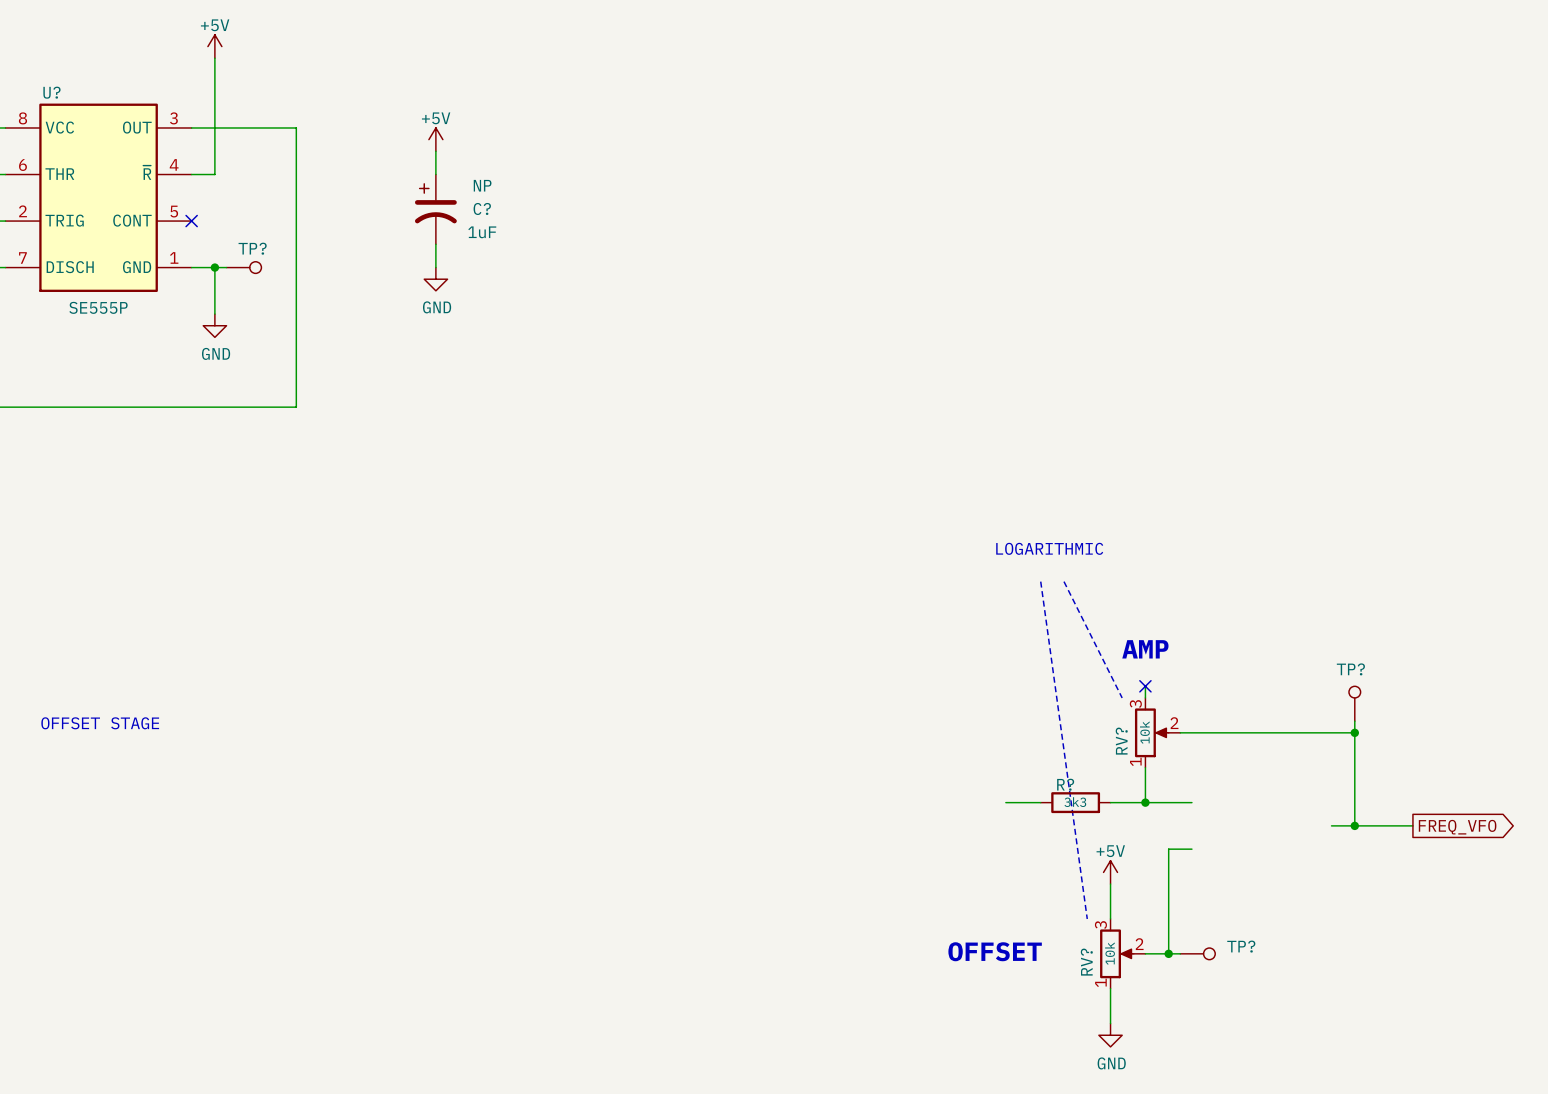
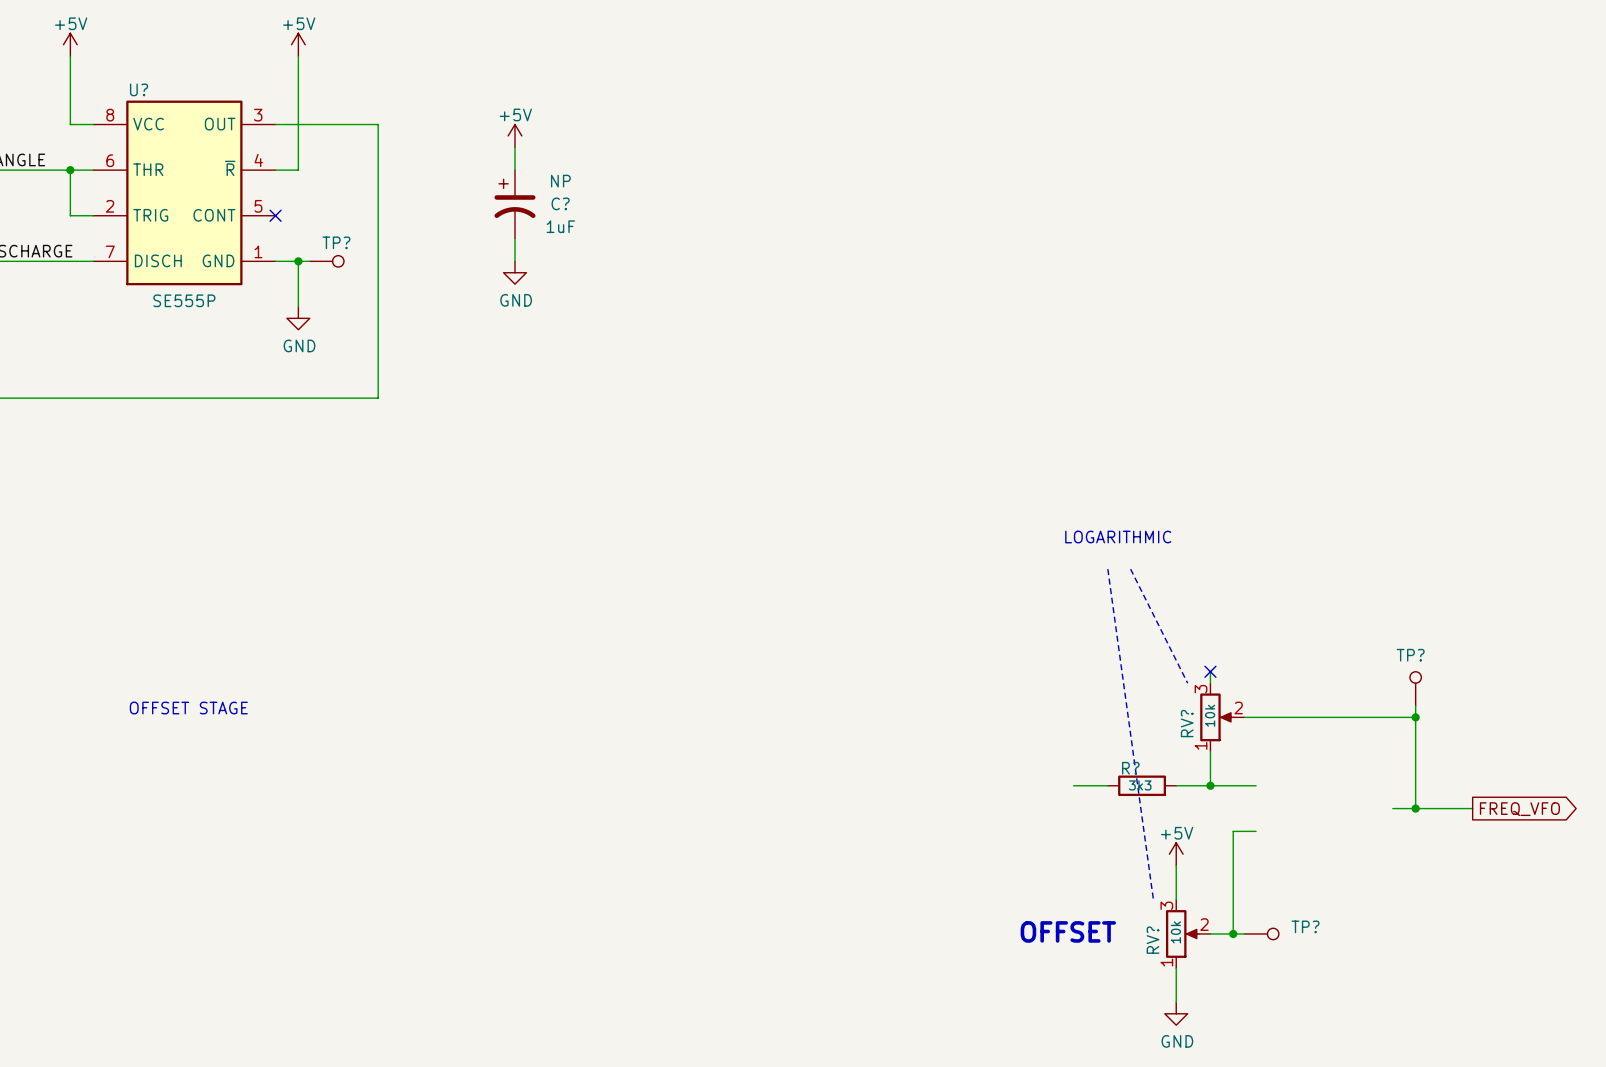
text: AMP (1145, 649) -> none

